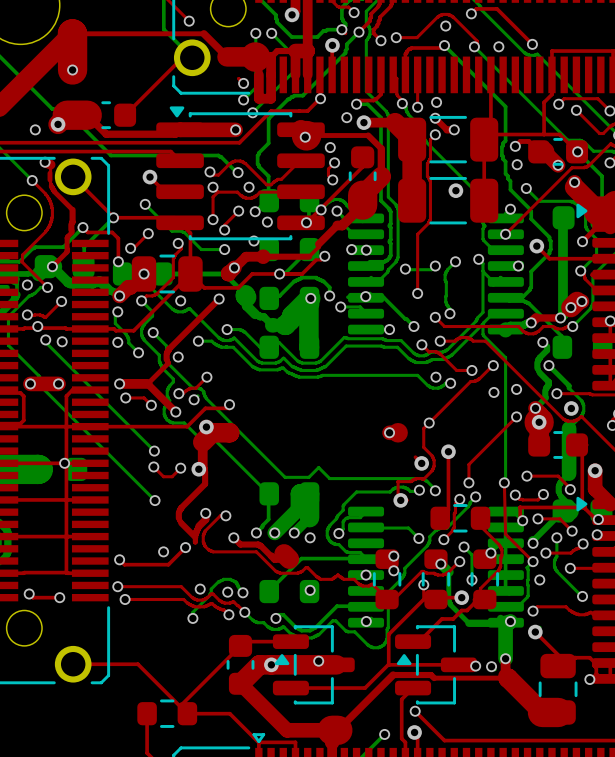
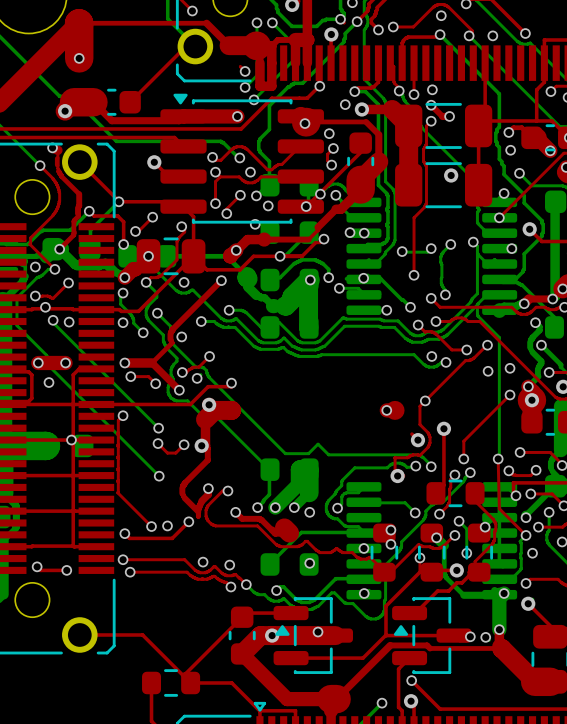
via: (35, 129) -> none
bottom track: (145, 204) (172, 231) (184, 232) (201, 249) (224, 249) -> none
via: (145, 204) -> none
via: (224, 249) -> none
via: none -> (48, 382)
top track: none -> (123, 415) (118, 420) (117, 492) (151, 526)
via: none -> (123, 415)
via: none -> (151, 526)
bottom track: (242, 592) (236, 583) (230, 579) (218, 581) (211, 589) (209, 595) (192, 612) (192, 618) -> none
via: (242, 592) -> none
via: (192, 618) -> none

